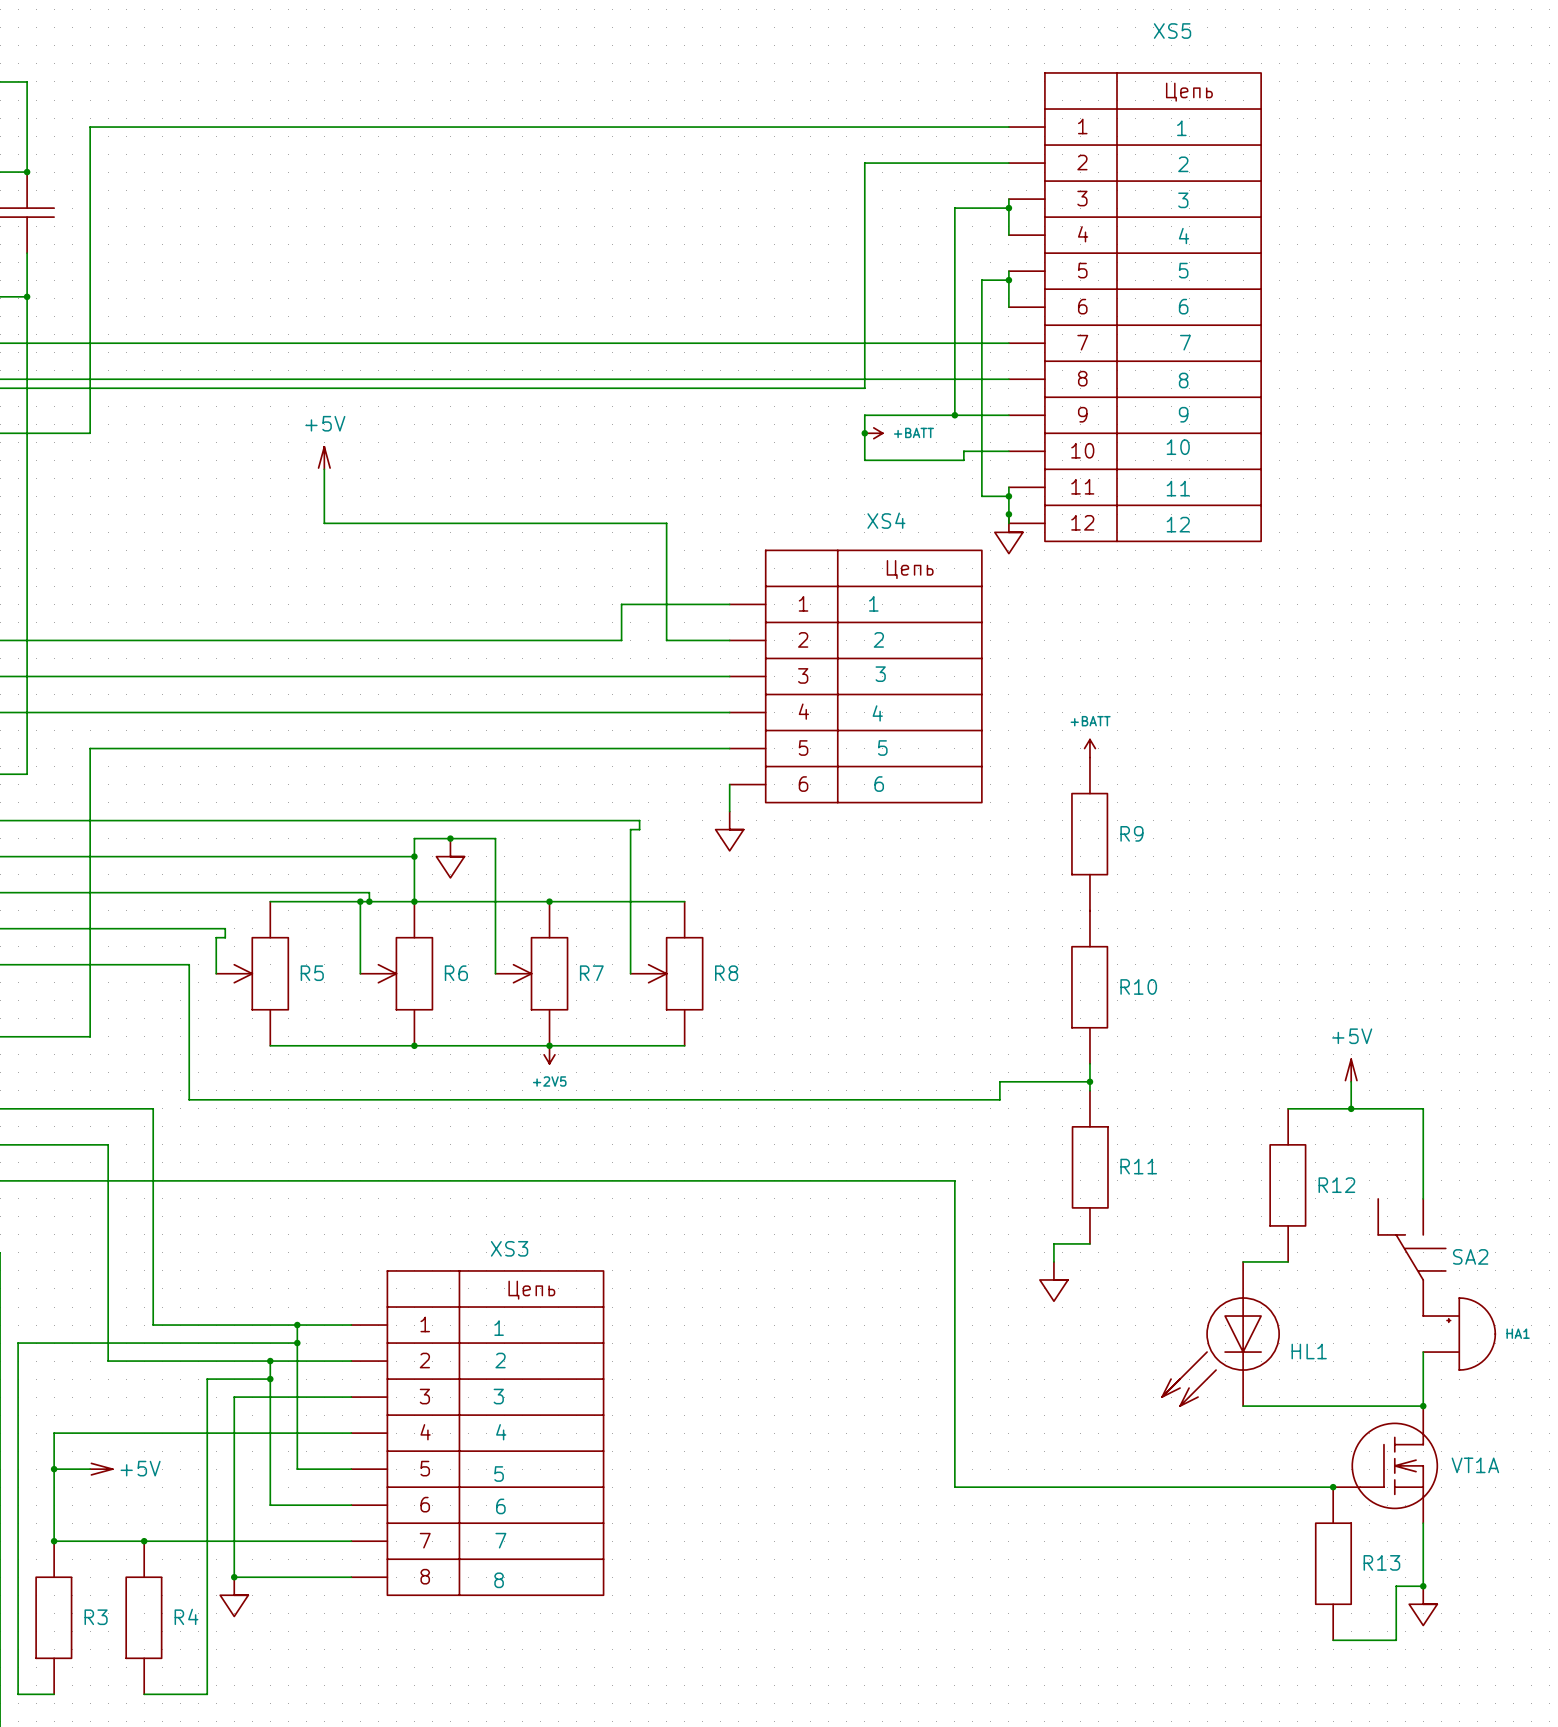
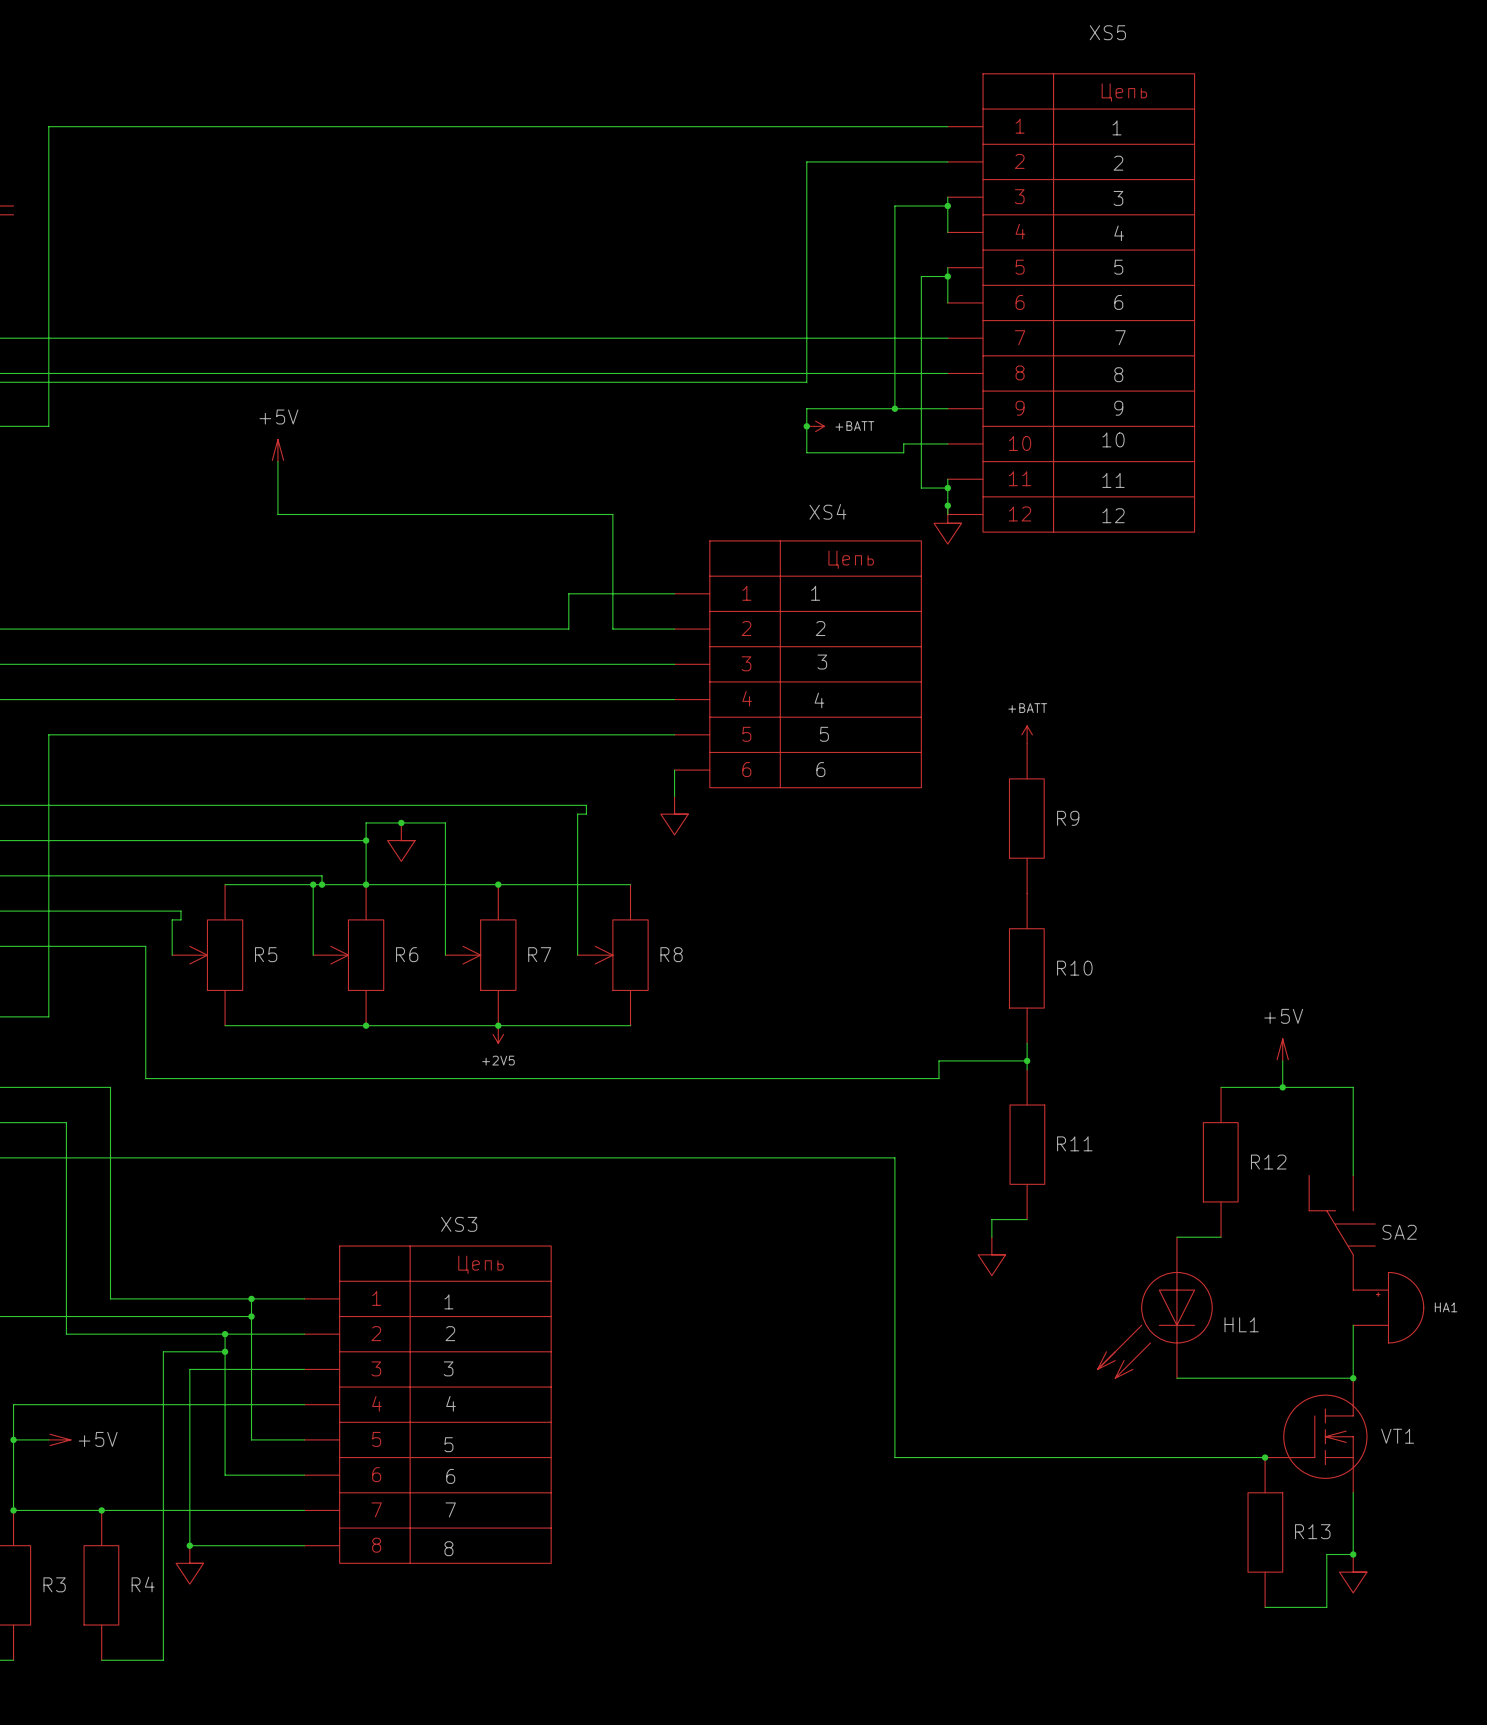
VT1A name: VT1A (1475, 1465) -> VT1 (1397, 1436)

